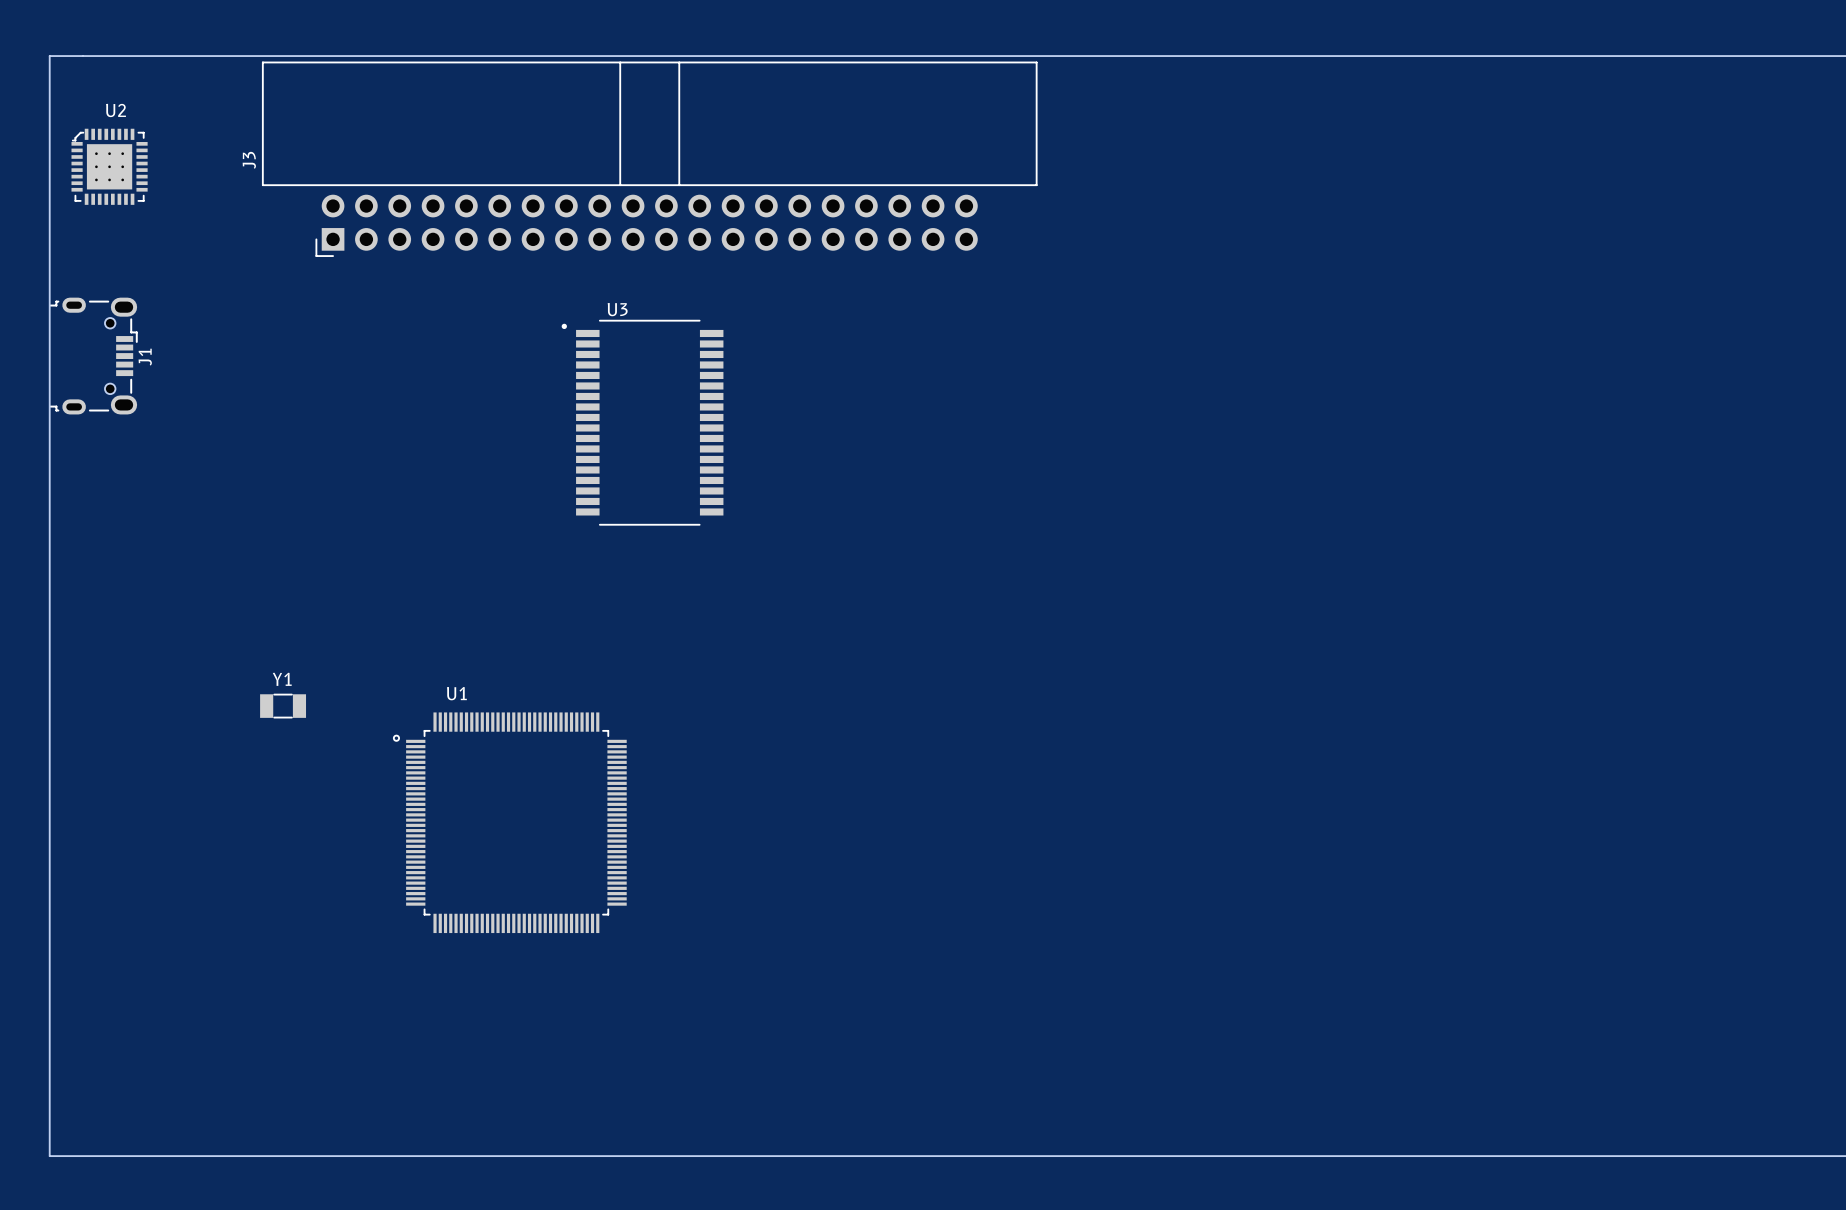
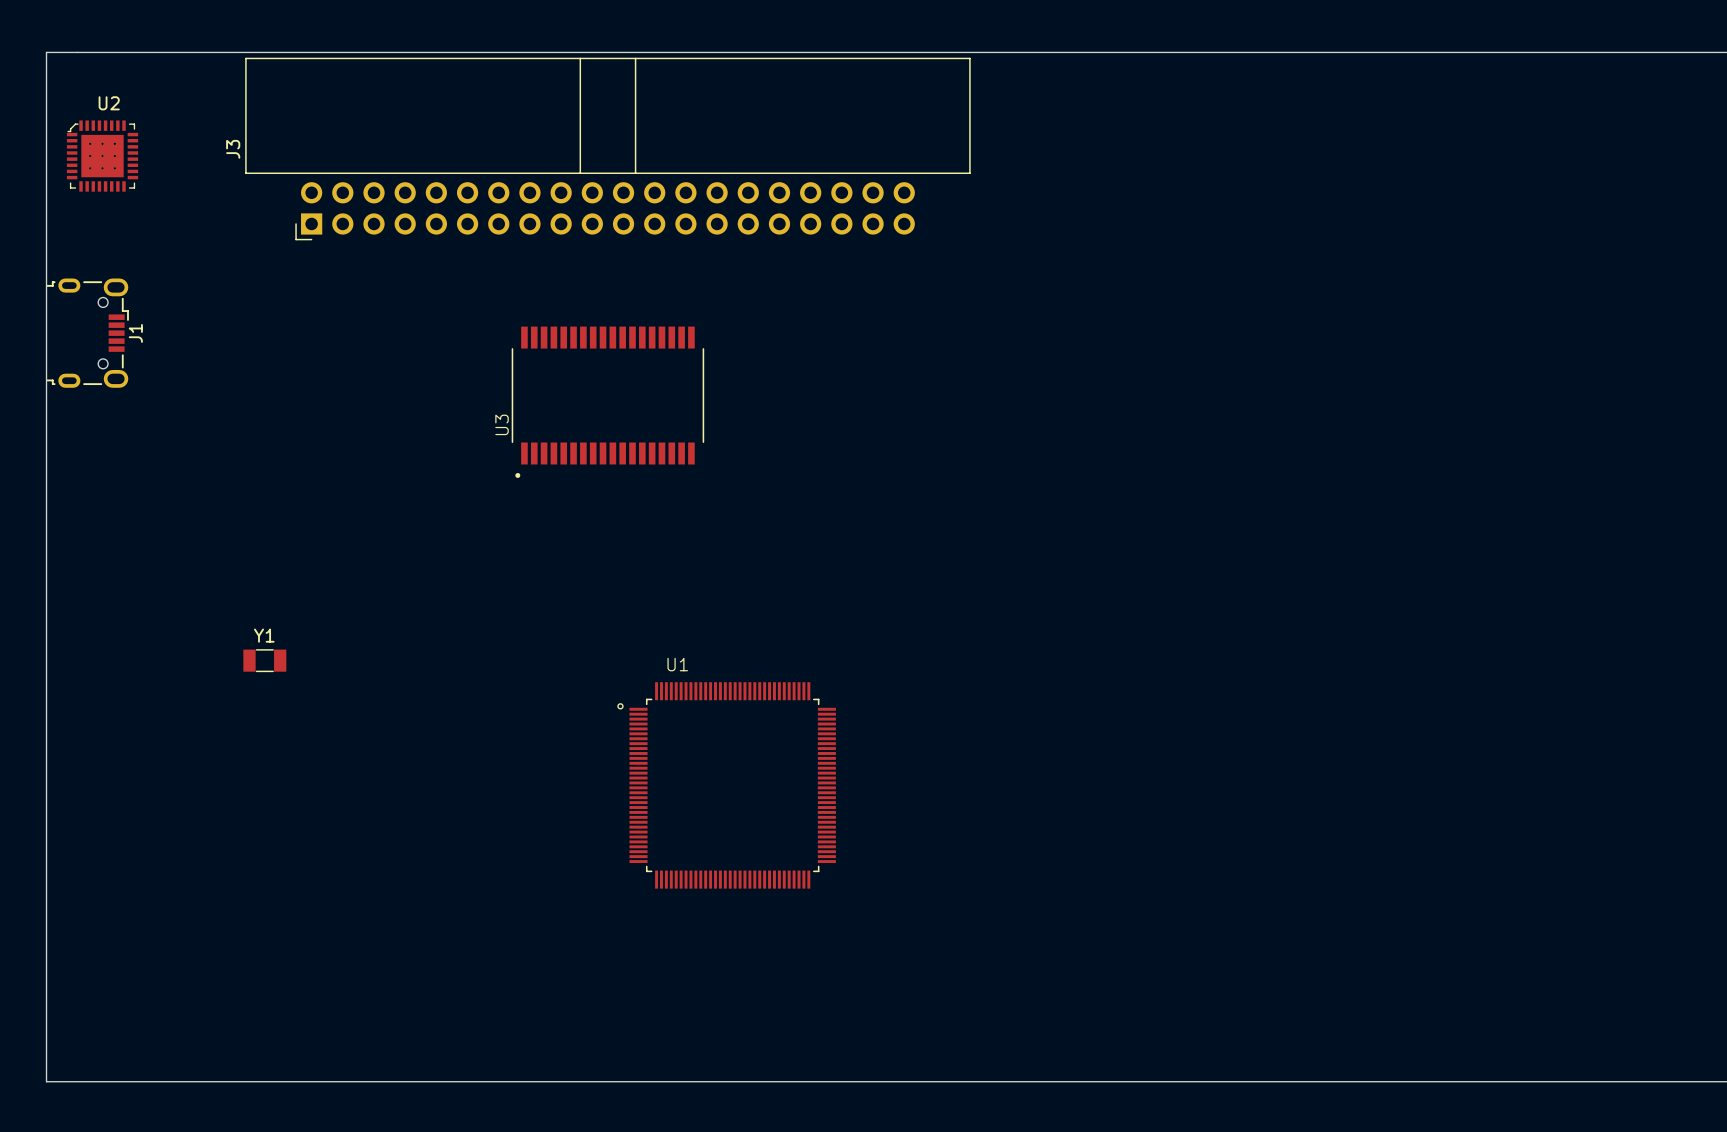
U3 rotation: 0° (642, 422) -> 90° counterclockwise (607, 402)
U1 position: (509, 822) -> (726, 785)

